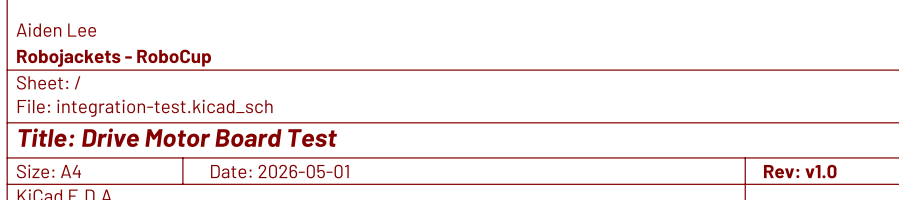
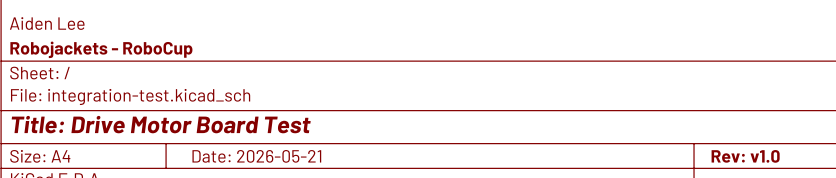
title block: Date: 2026-05-01 (279, 171) -> Date: 2026-05-21 (256, 156)

